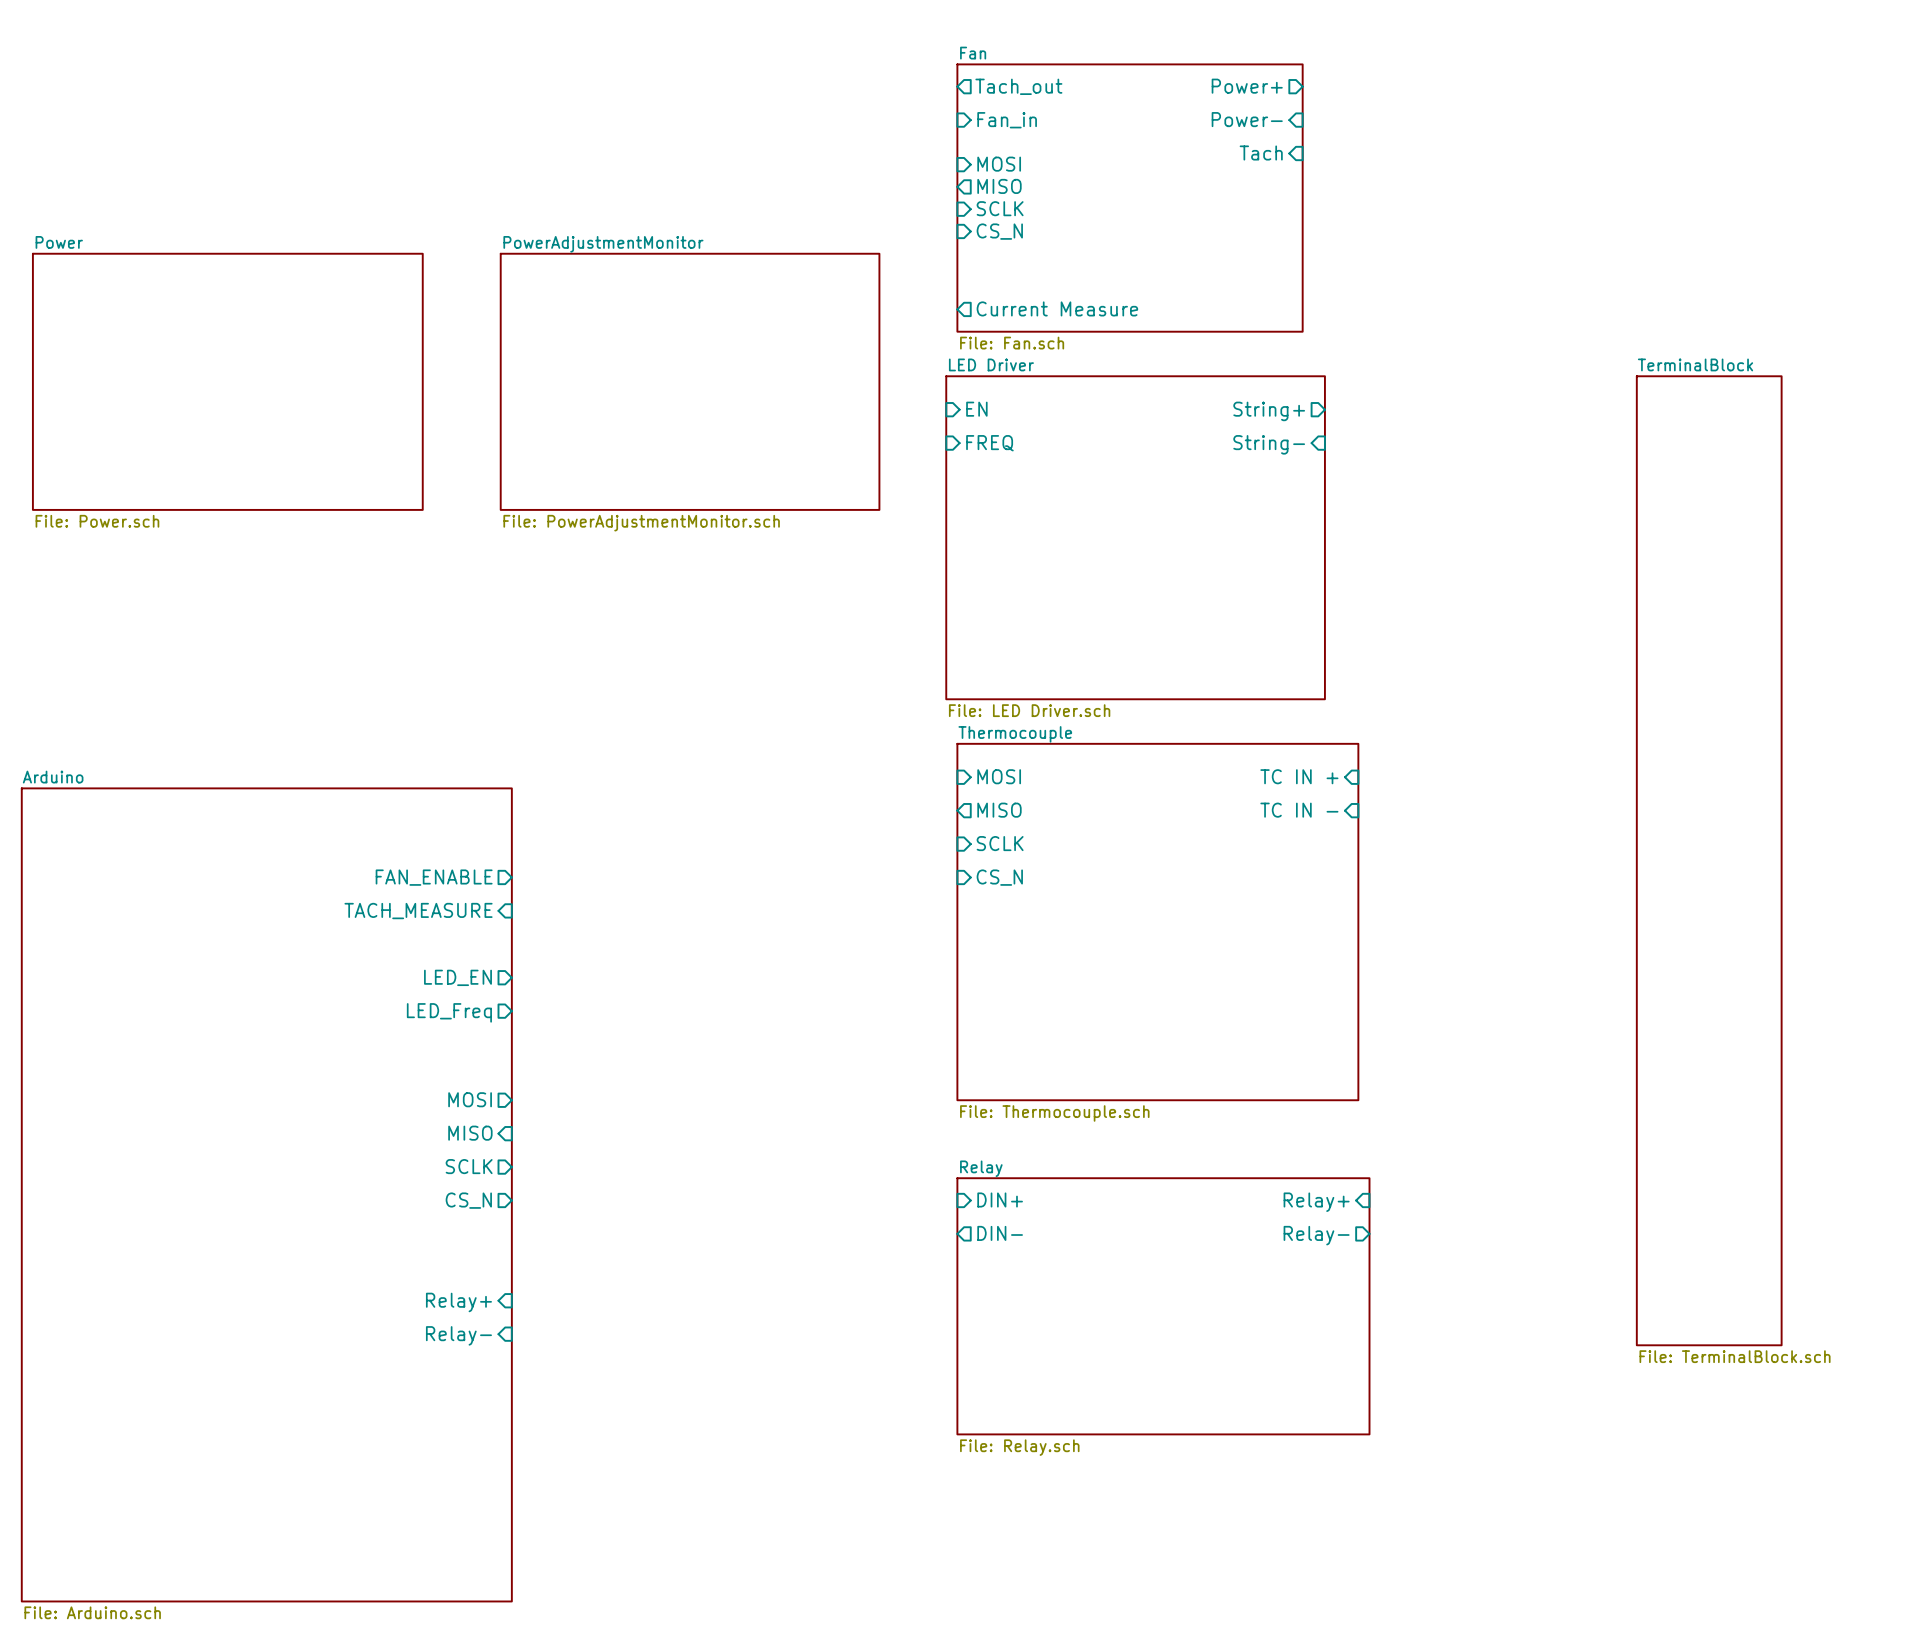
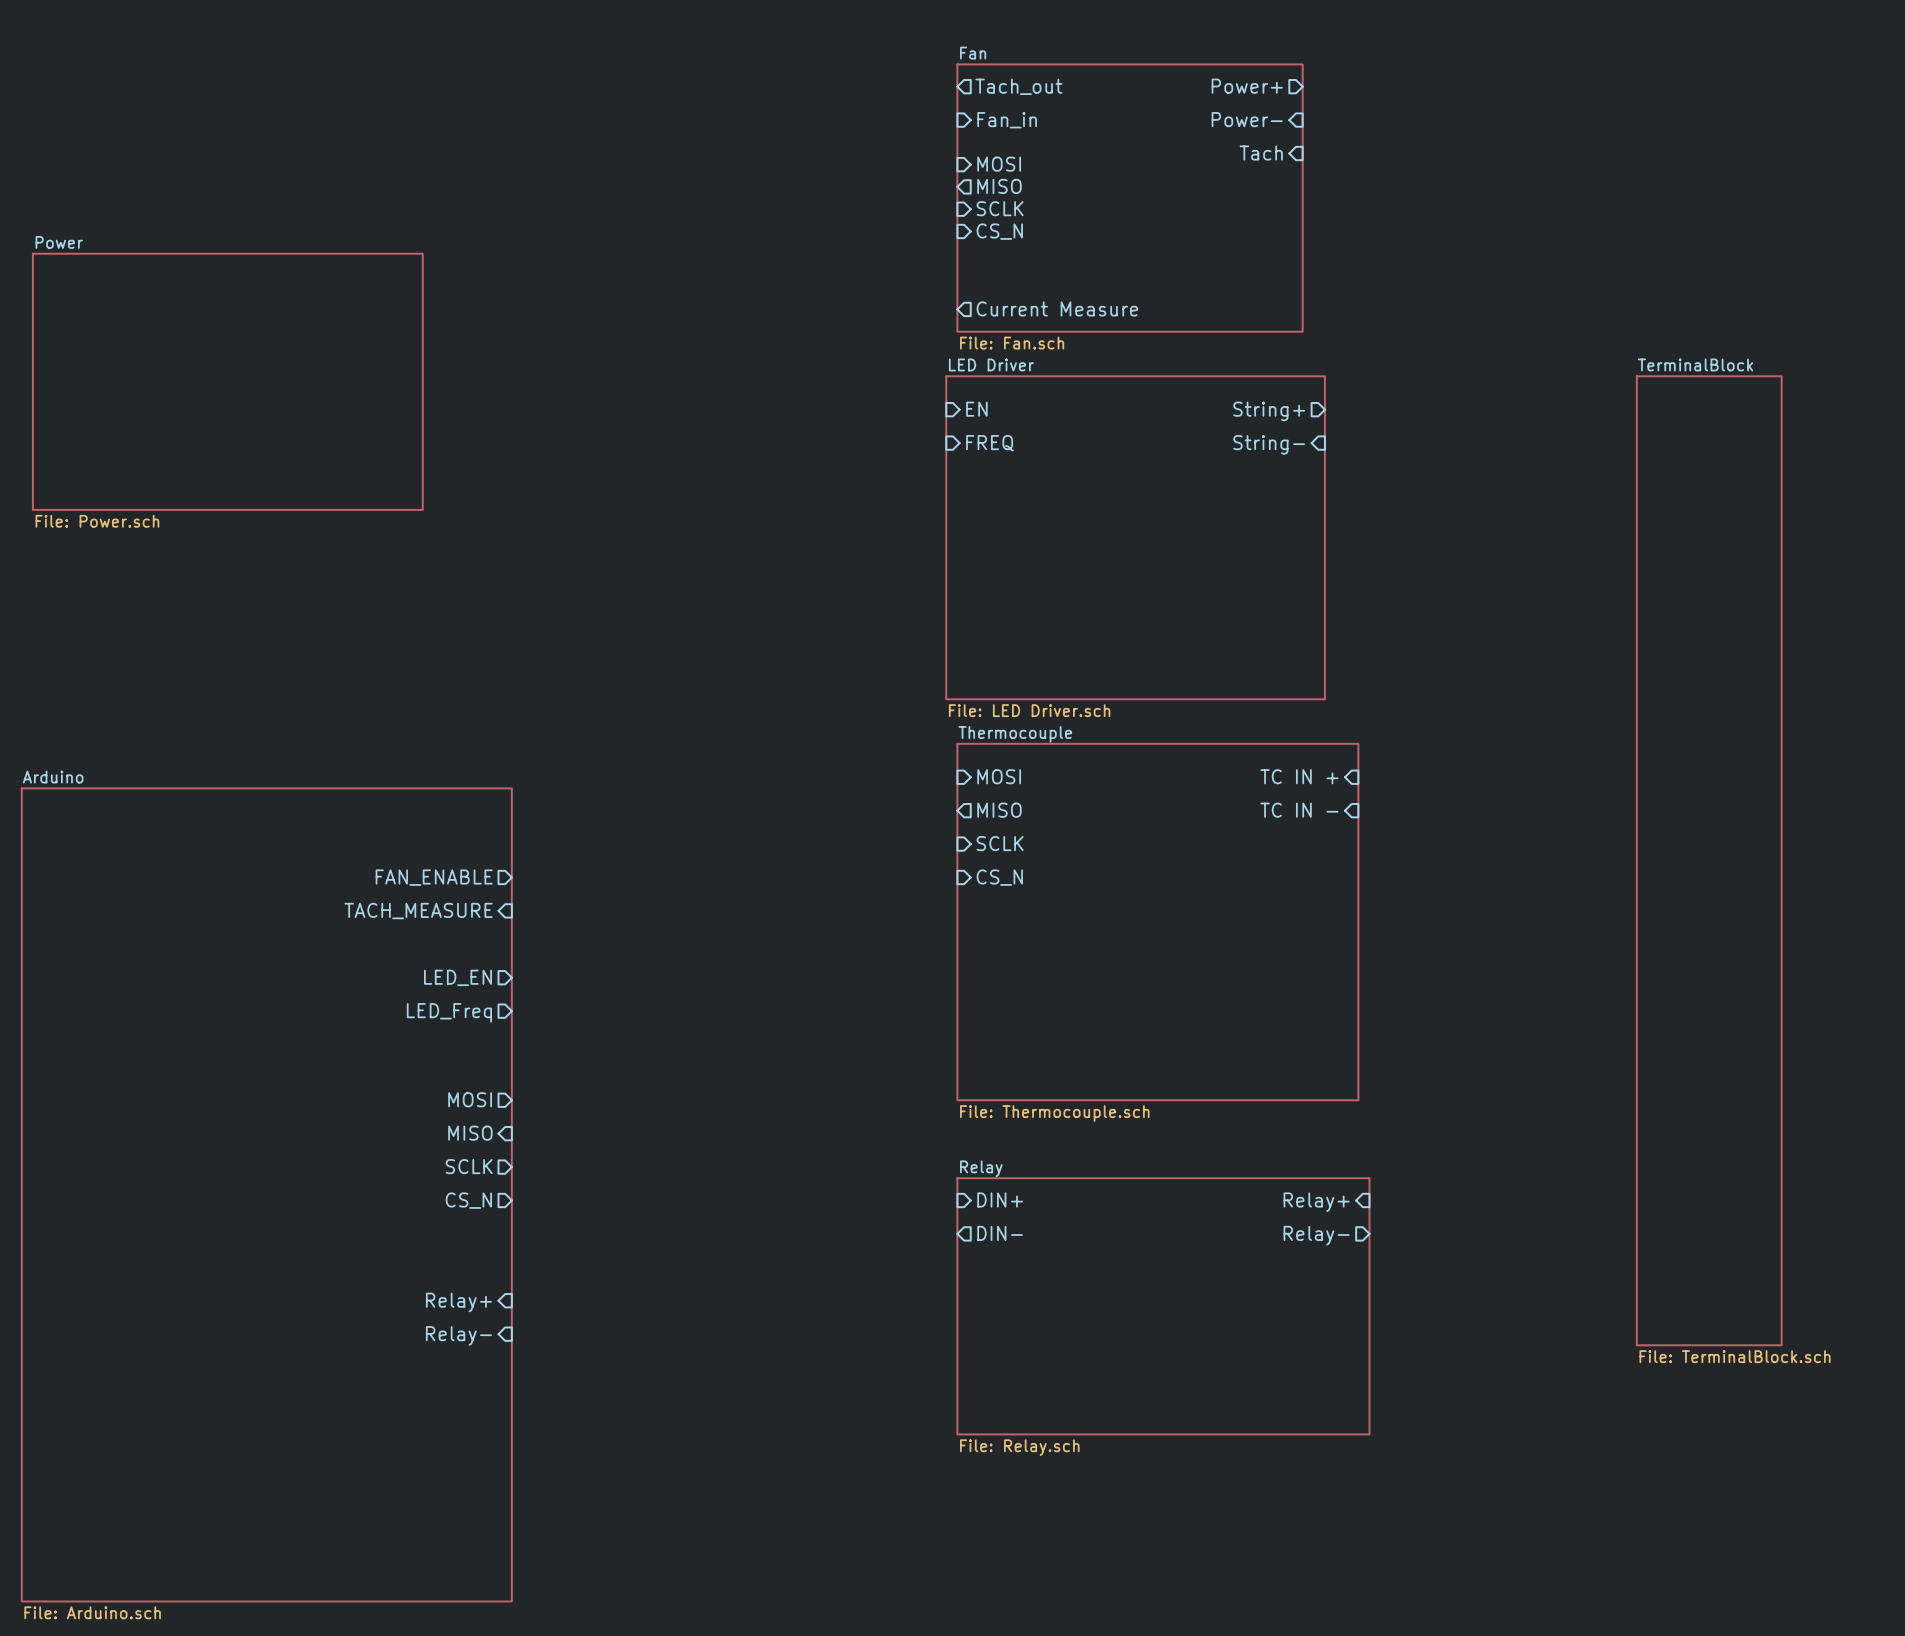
sheet PowerAdjustmentMonitor: File: PowerAdjustmentMonitor.sch (690, 381) -> none

